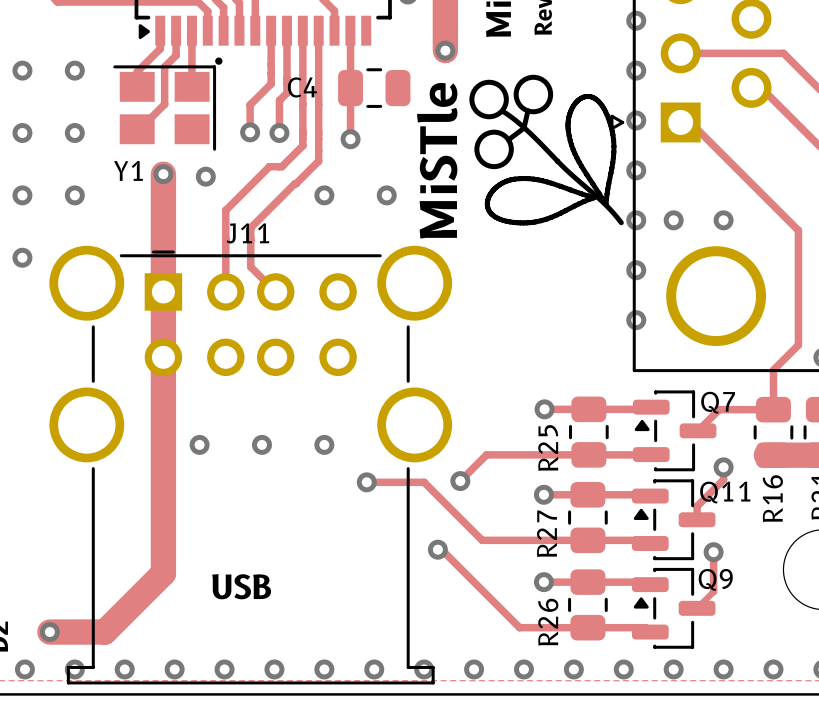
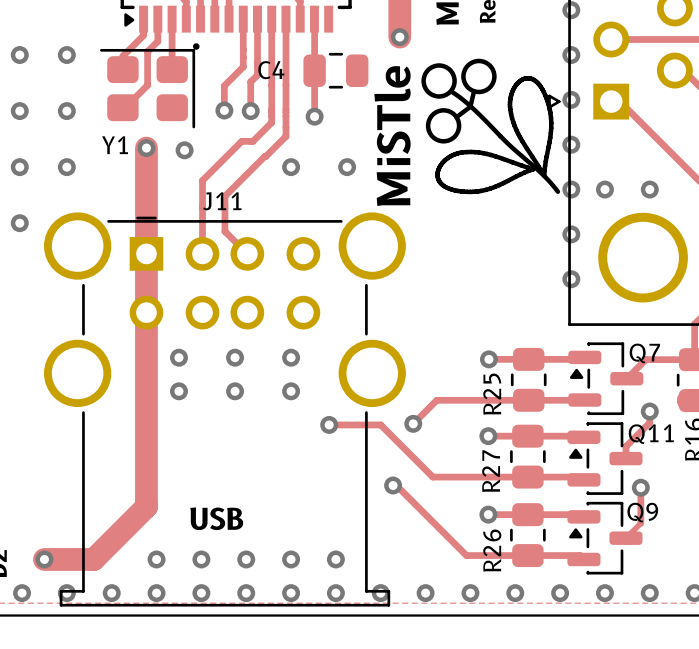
Y1 footprint: [113, 65, 217, 151] -> [100, 48, 196, 129]
via: none -> (178, 357)
via: none -> (235, 357)
via: none -> (291, 357)
via: none -> (156, 559)
via: none -> (201, 559)
via: none -> (246, 559)
via: none -> (291, 559)
via: none -> (335, 559)

